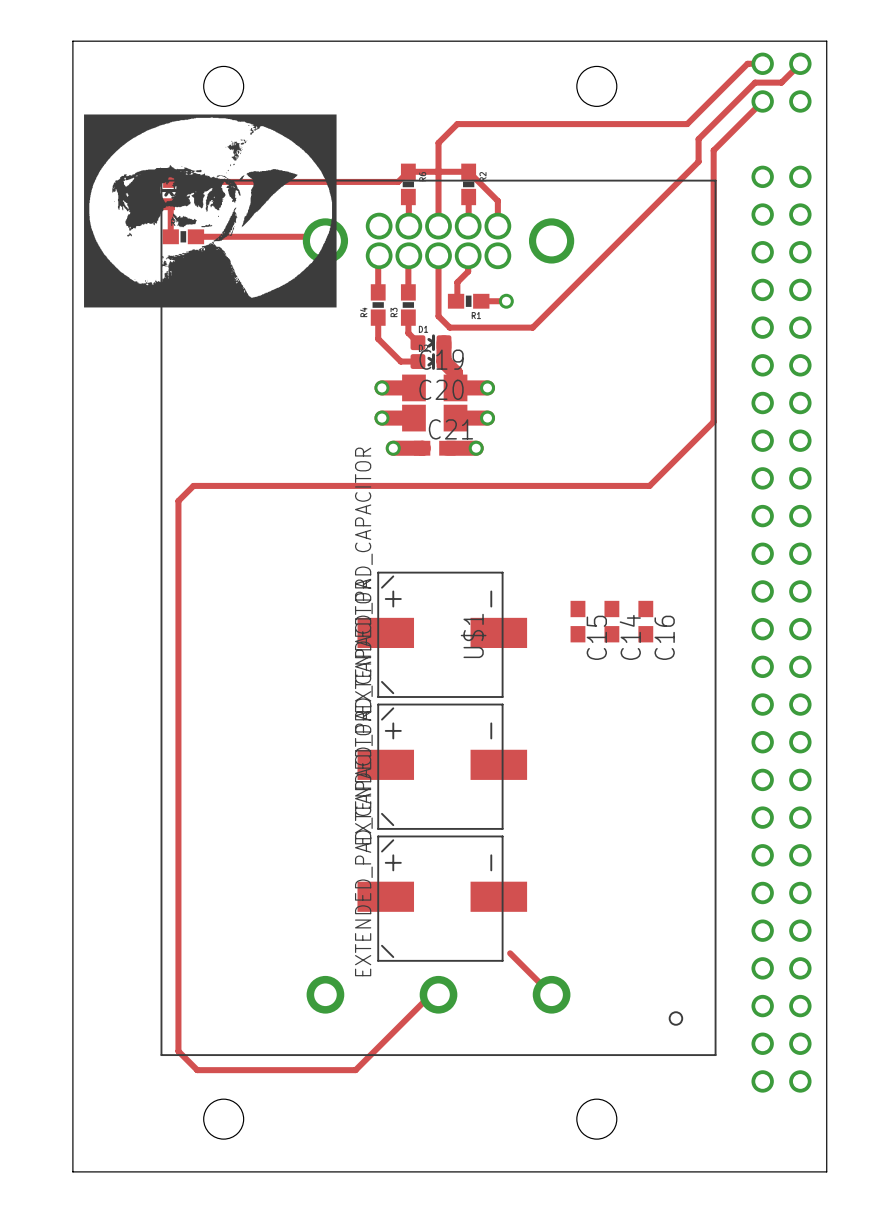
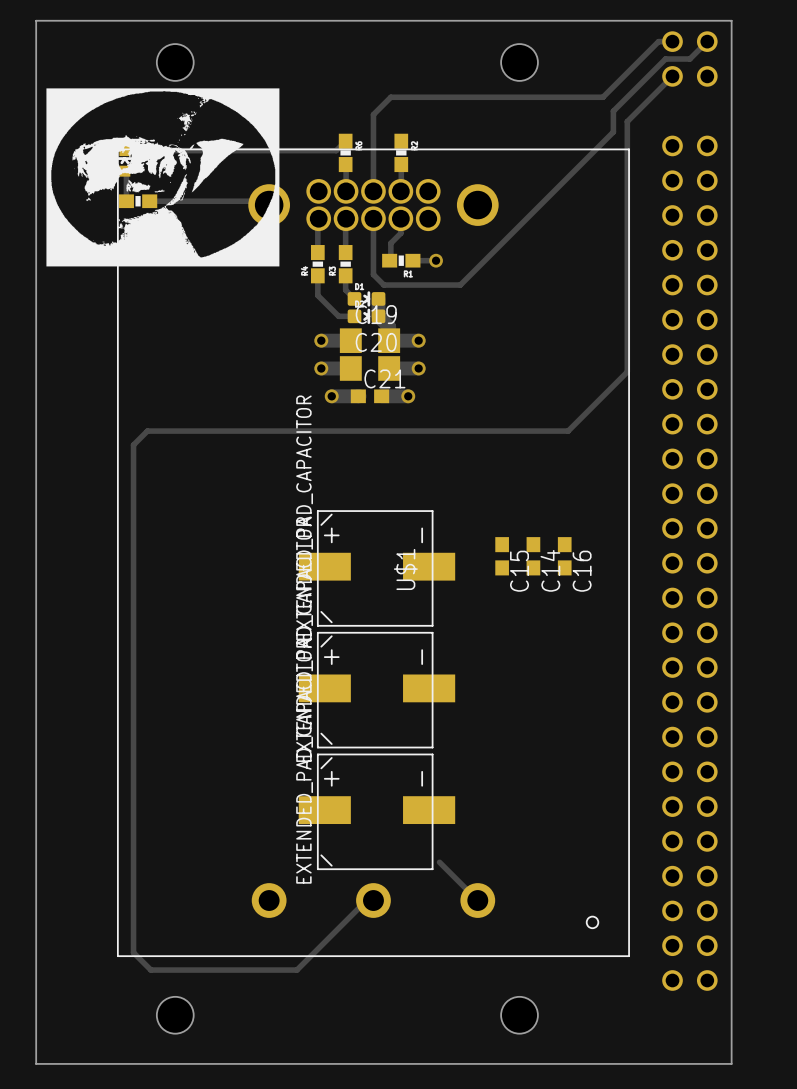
track: (408, 171) (468, 171) (497, 200) (497, 226) -> none

